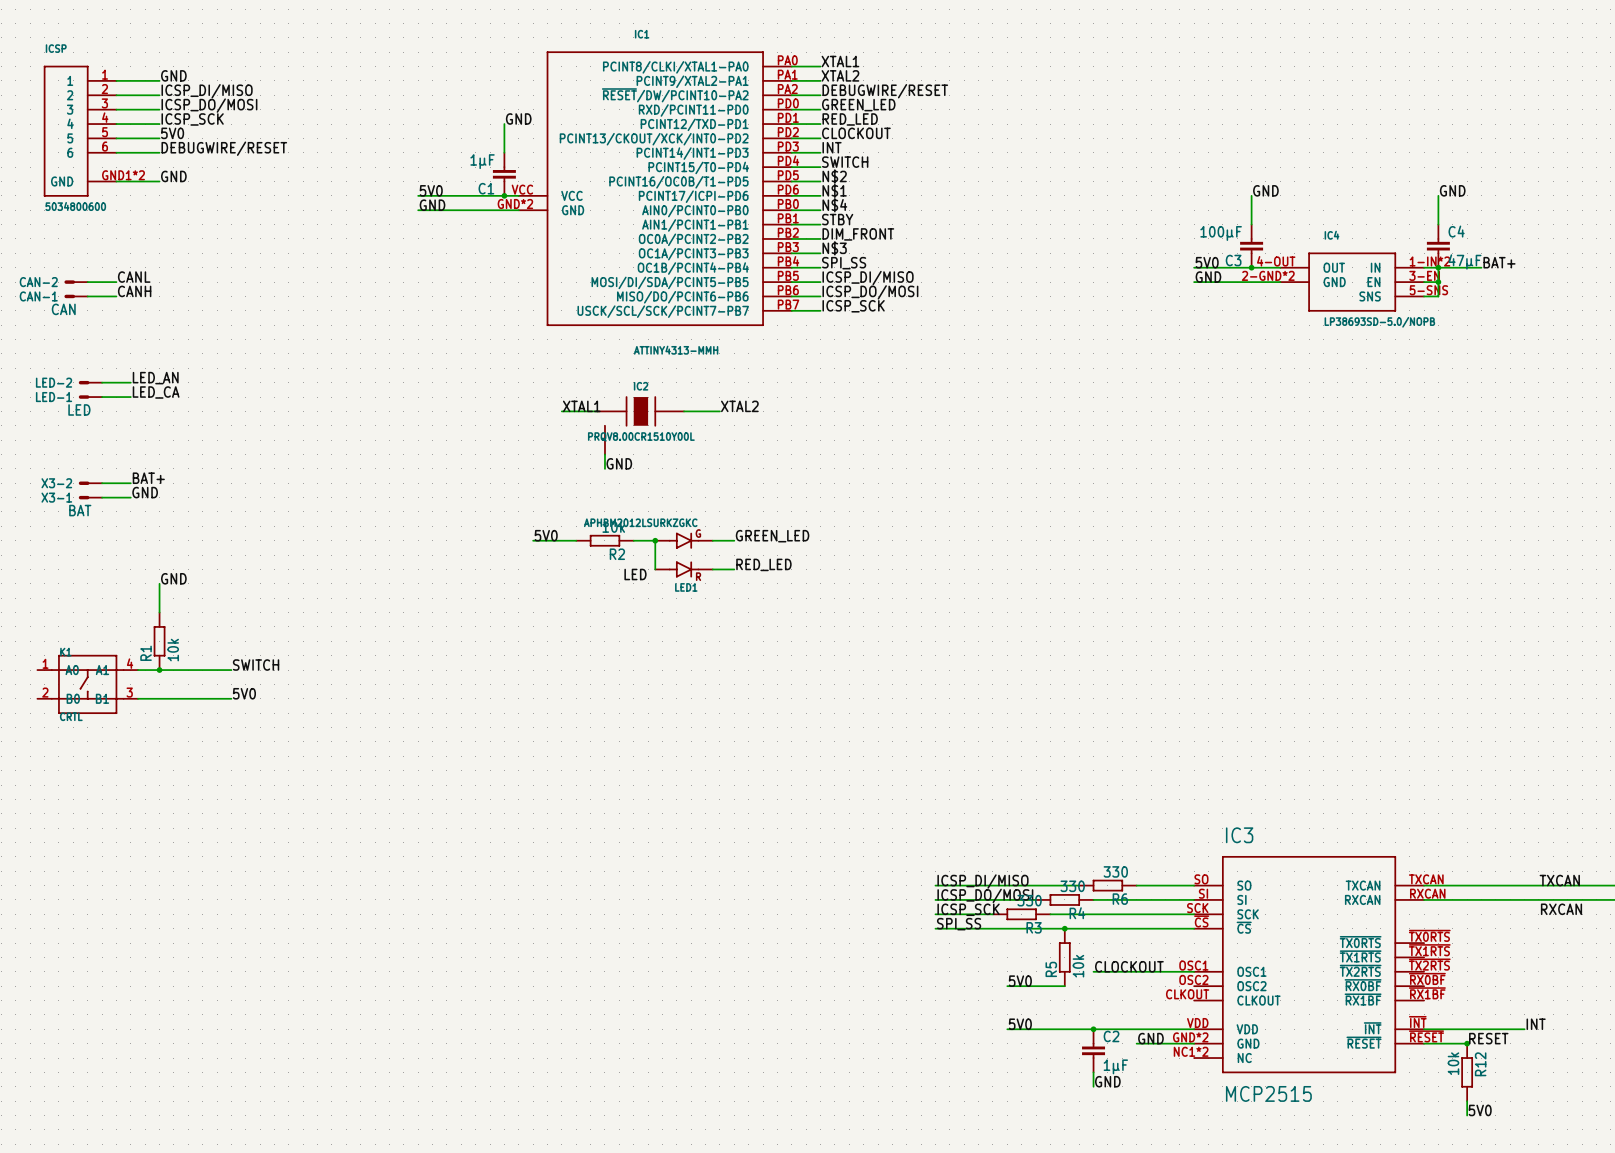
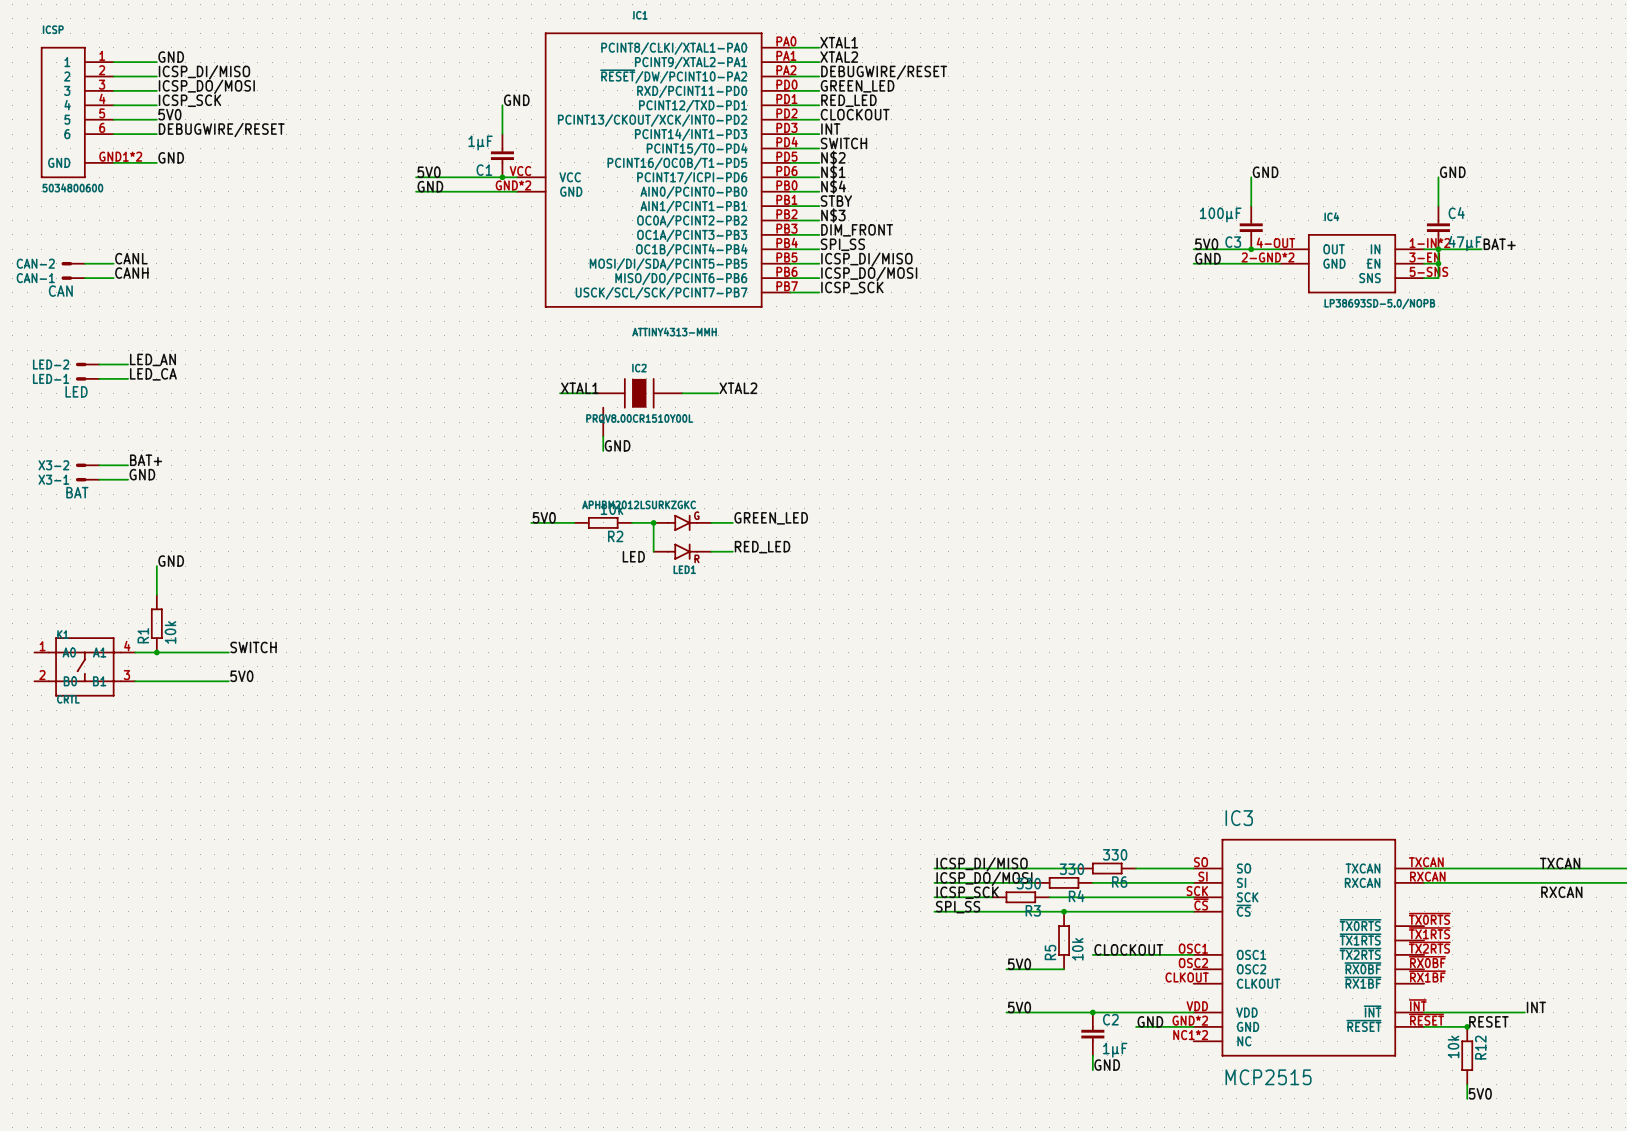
label: DIM_FRONT (858, 234) -> N$3 (833, 215)
label: N$3 (834, 248) -> DIM_FRONT (857, 230)

